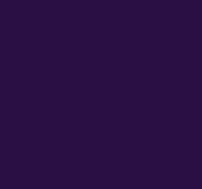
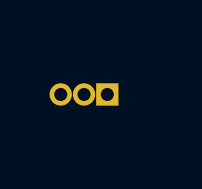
part: none -> (84, 94)

